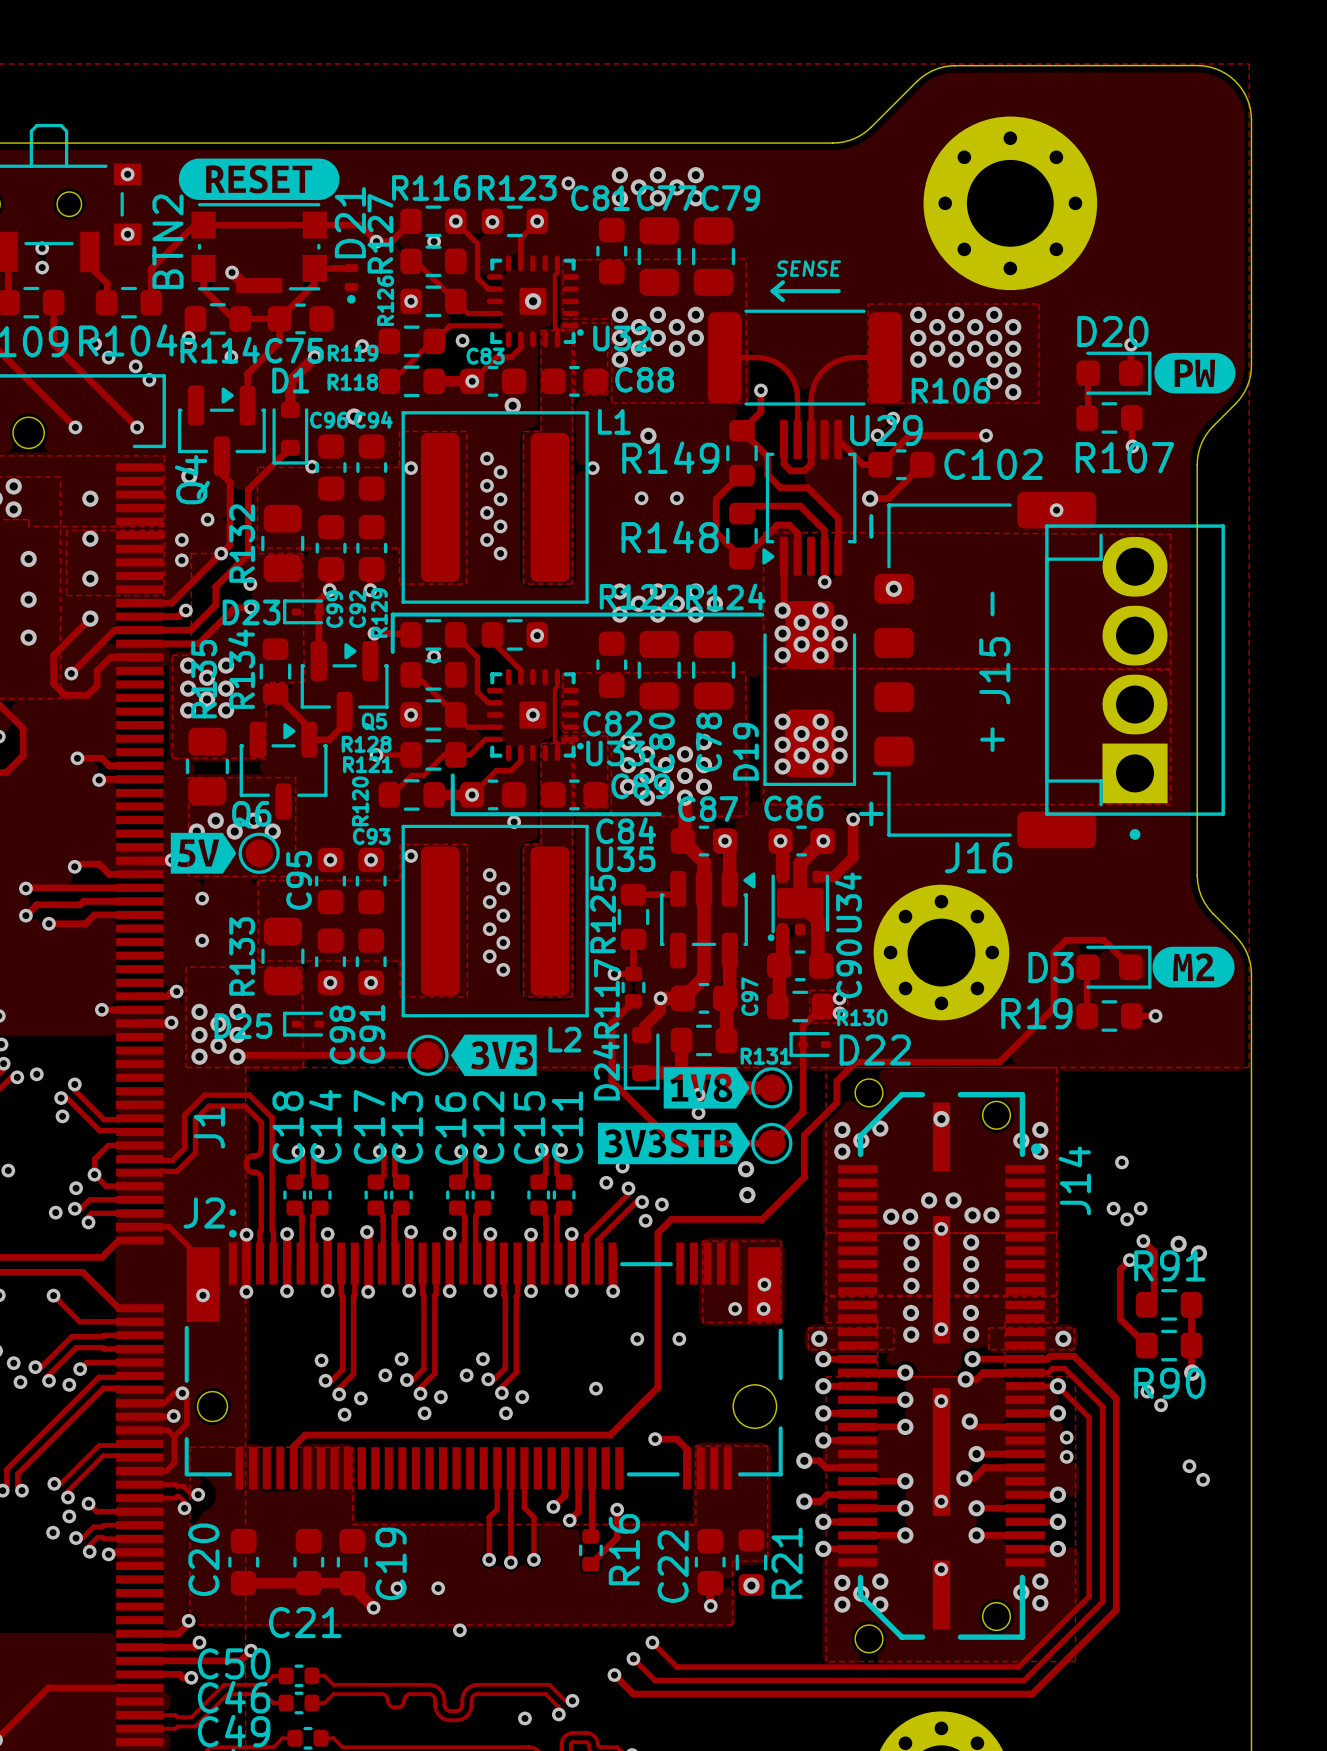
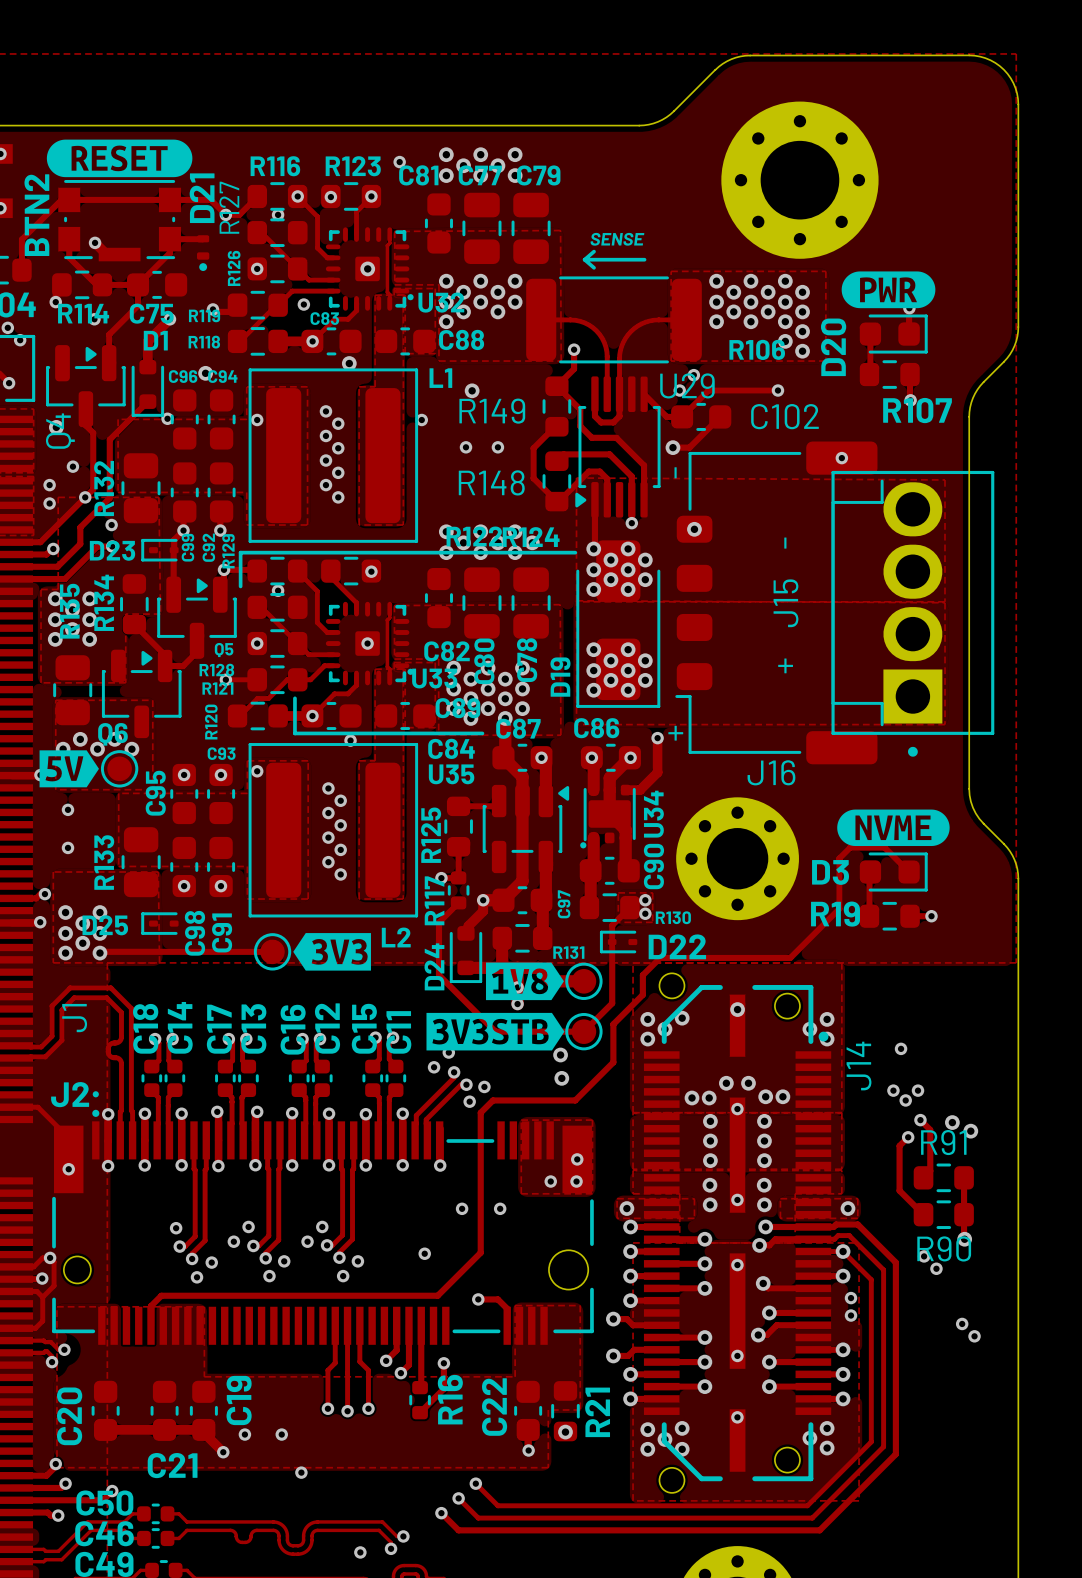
drawing: none -> [841, 271, 936, 309]
D20 name rotation: 0° (1112, 331) -> 90° counterclockwise (833, 347)
drawing: [1154, 352, 1236, 394] -> none
drawing: none -> [837, 809, 950, 847]
drawing: [1152, 946, 1235, 988] -> none

